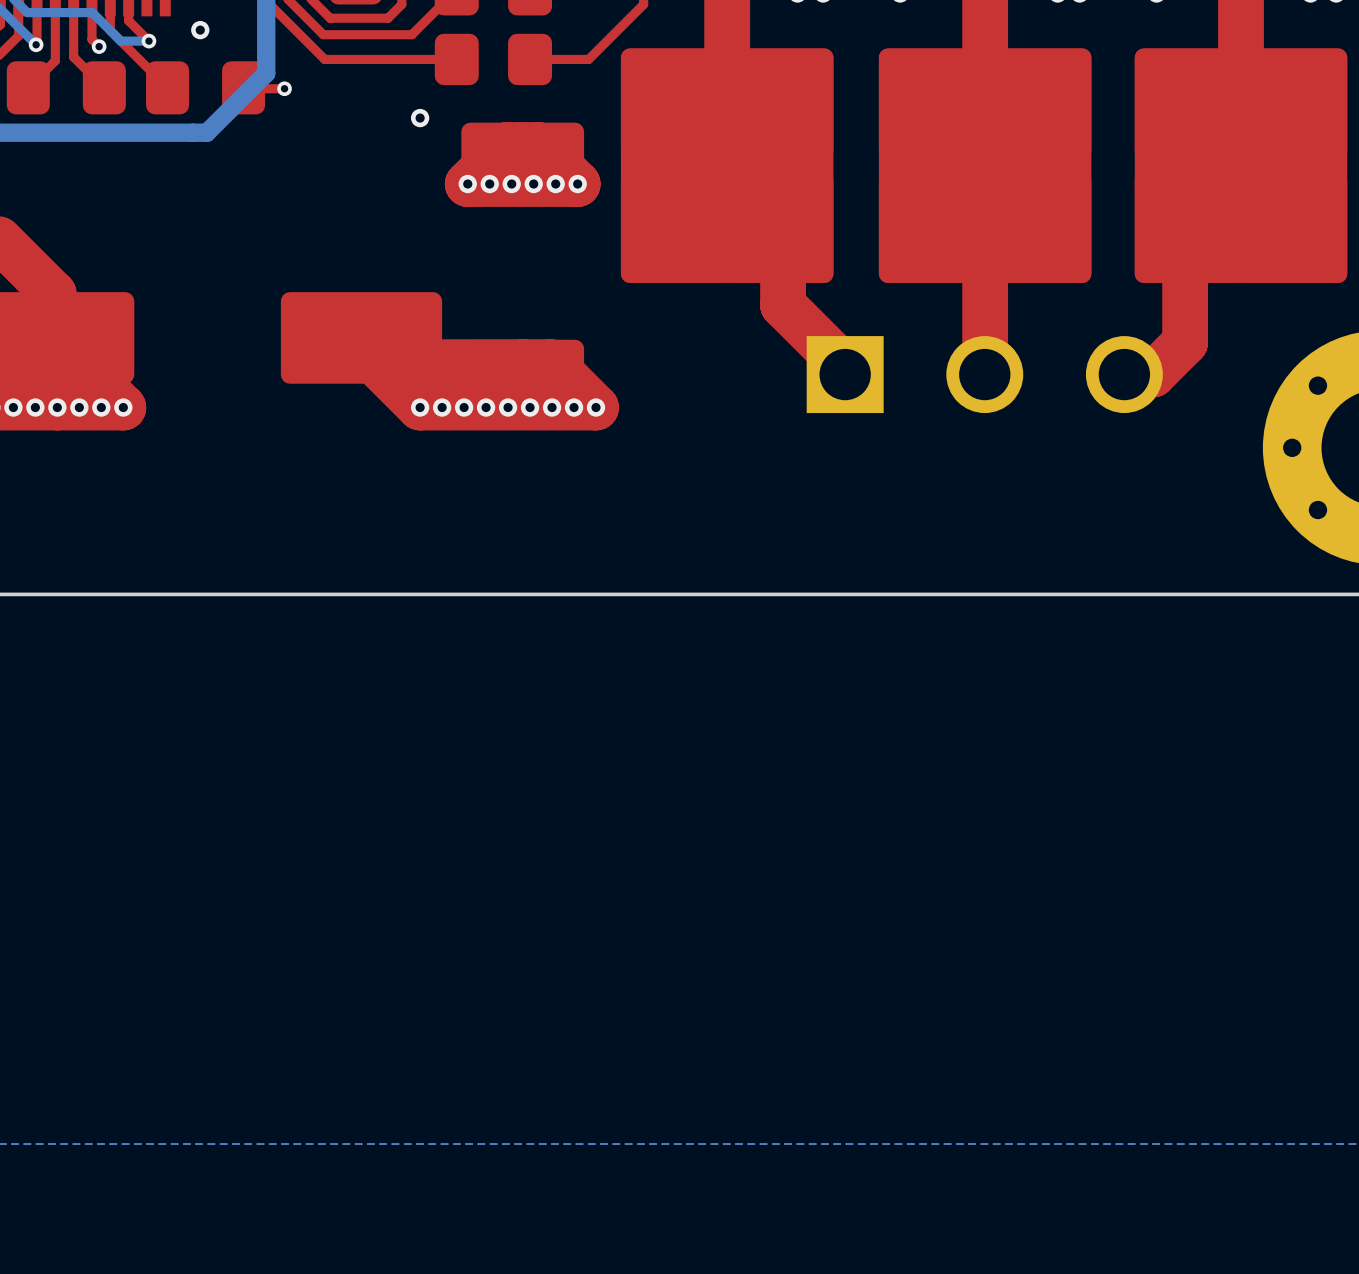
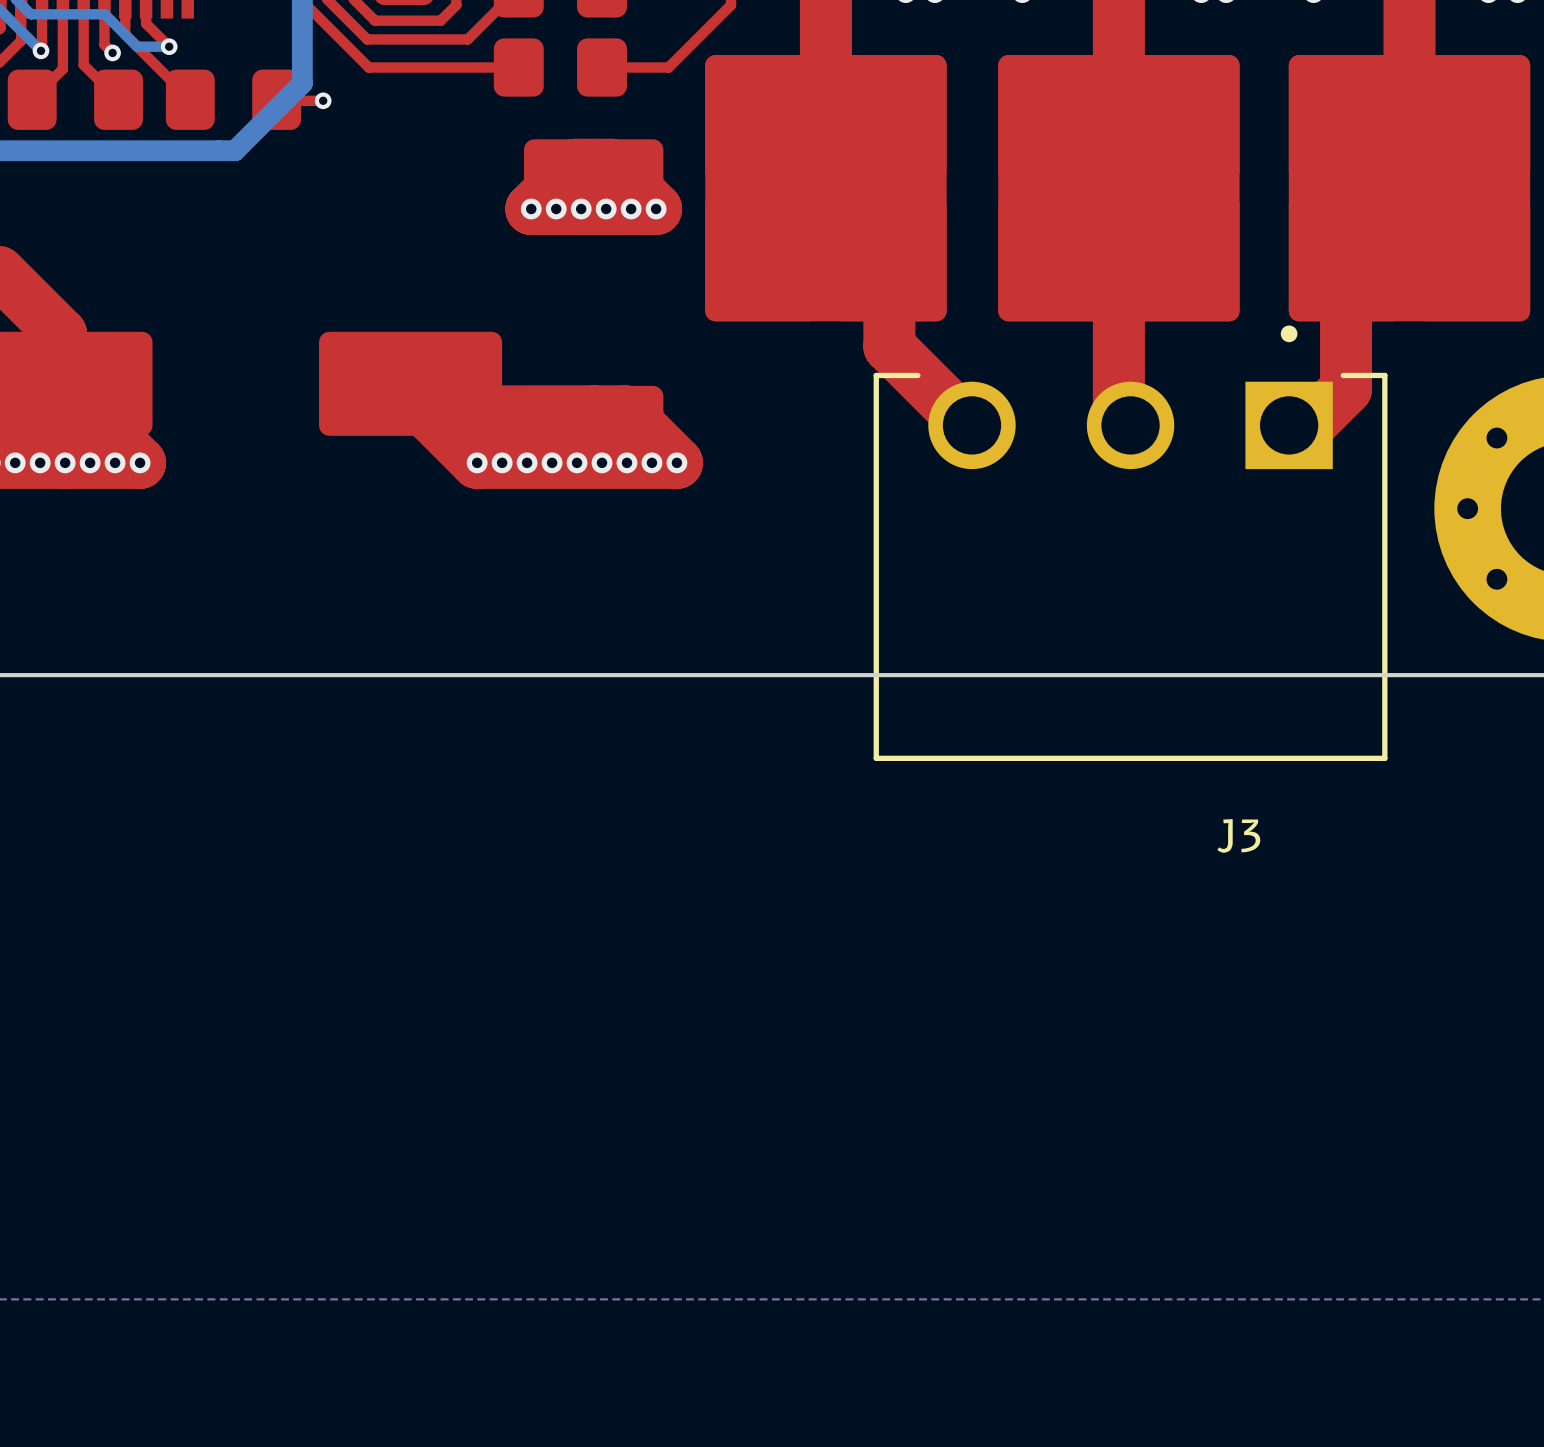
via: (200, 30) -> none
via: (420, 118) -> none
J3 side: top (984, 374) -> bottom (1130, 543)

